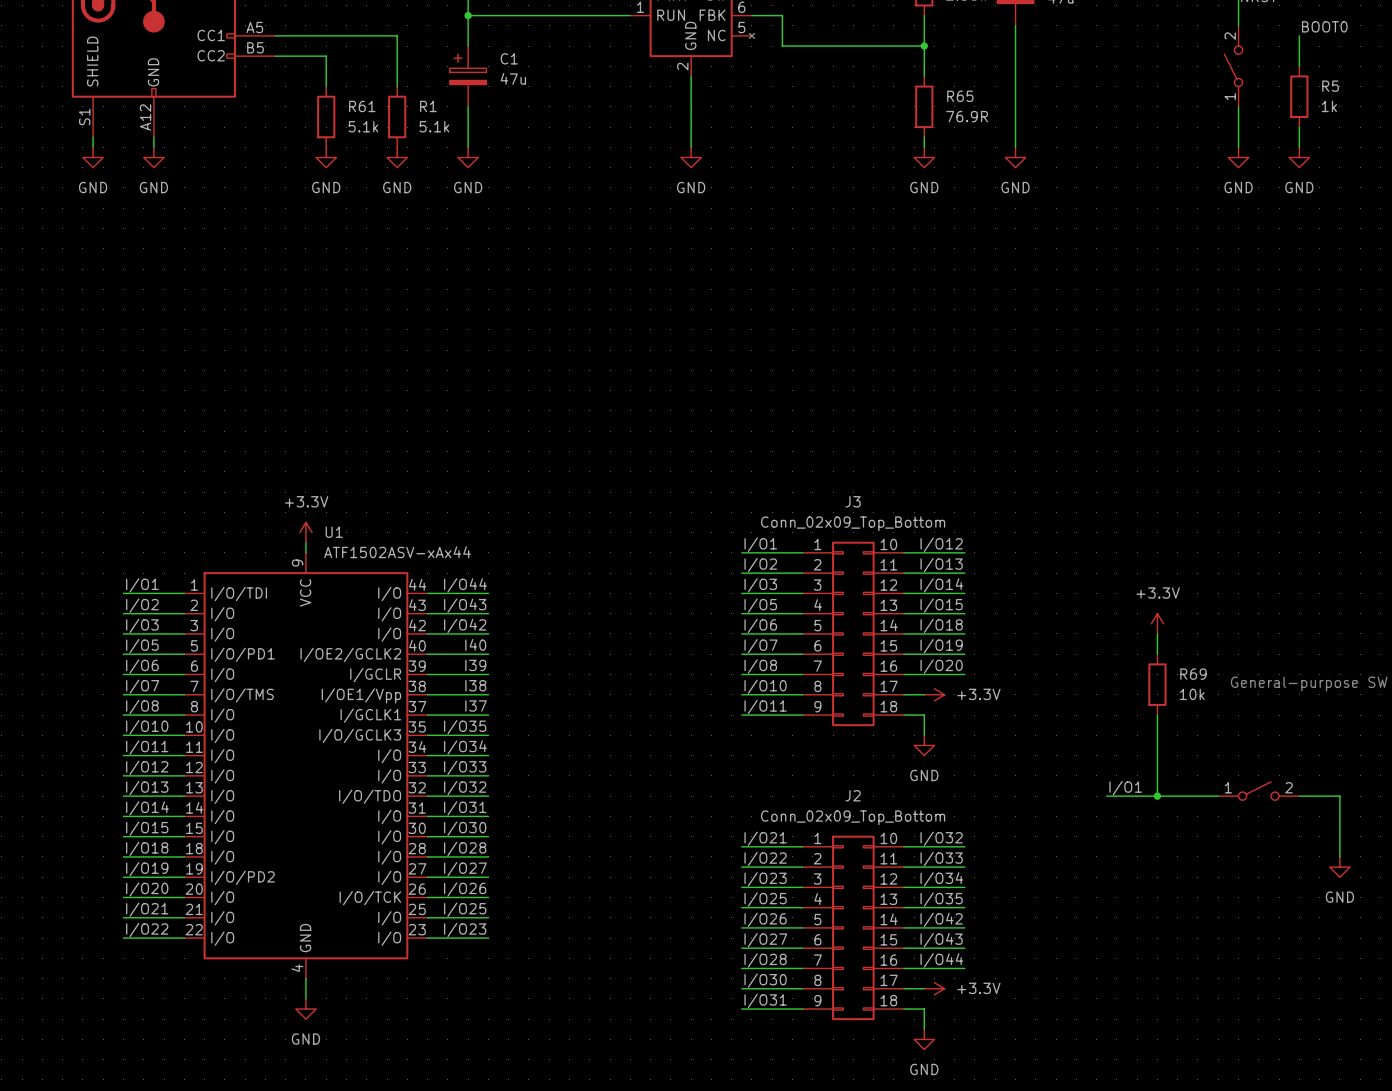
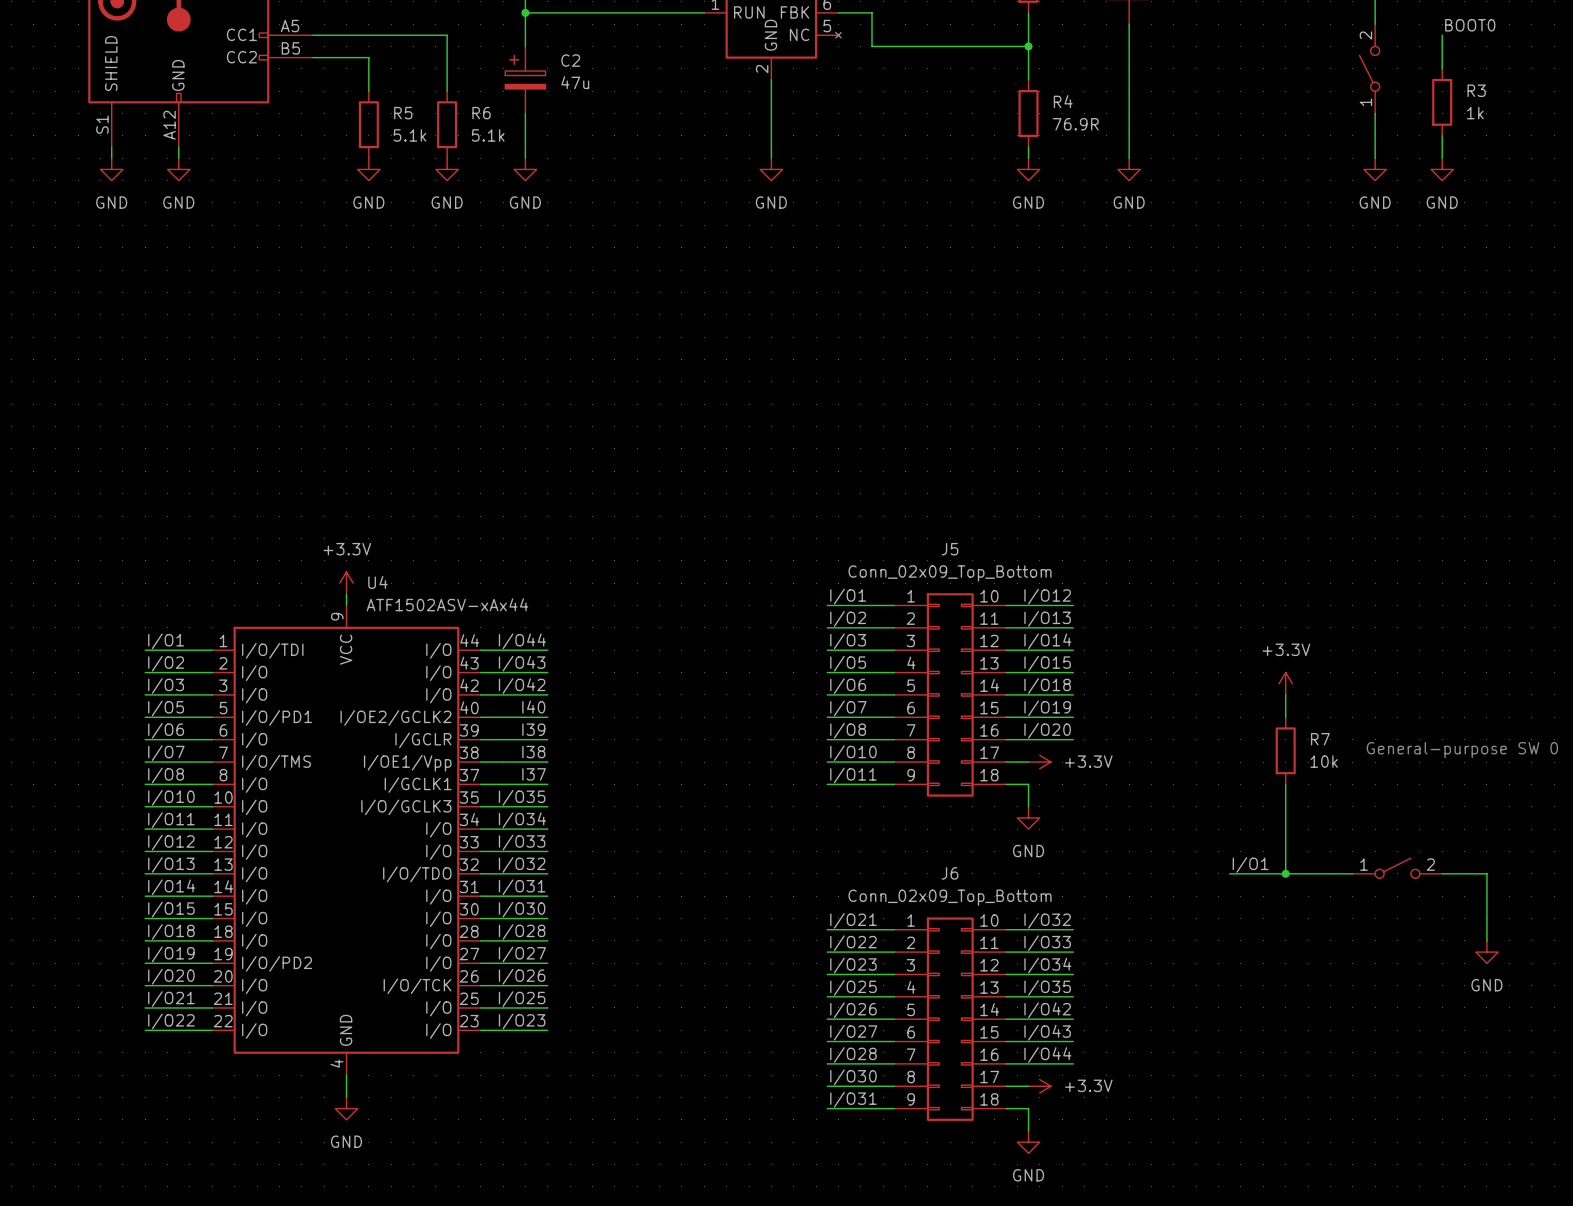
C1 name: C1 (509, 58) -> C2 (570, 60)
R5 name: R5 (1330, 86) -> R3 (1476, 90)
R65 name: R65 (960, 96) -> R4 (1063, 101)
R61 name: R61 (362, 106) -> R5 (403, 113)
R1 name: R1 (428, 106) -> R6 (481, 113)
J3 name: J3 (853, 501) -> J5 (950, 549)
U1 name: U1 (334, 532) -> U4 (377, 582)
R69 name: R69 (1193, 674) -> R7 (1320, 739)
J2 name: J2 (853, 795) -> J6 (950, 873)

